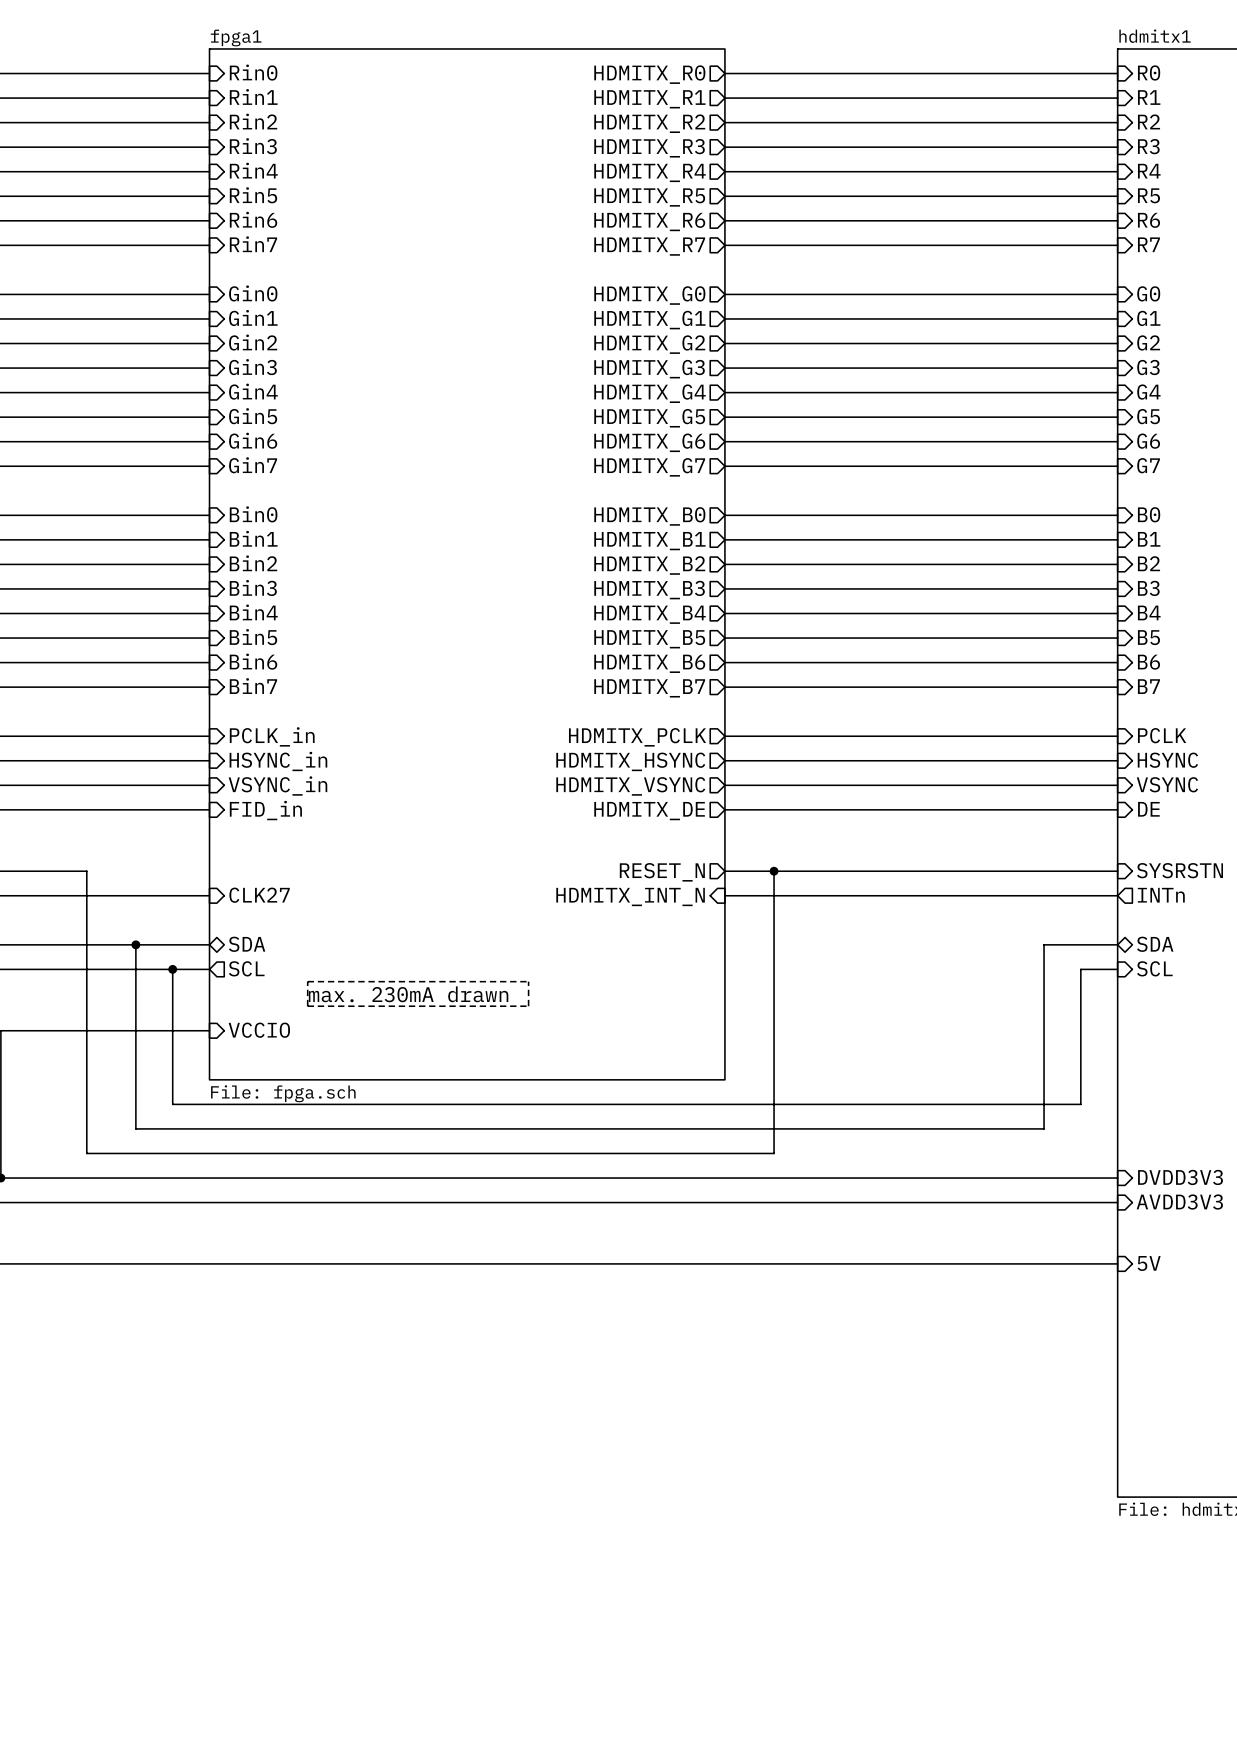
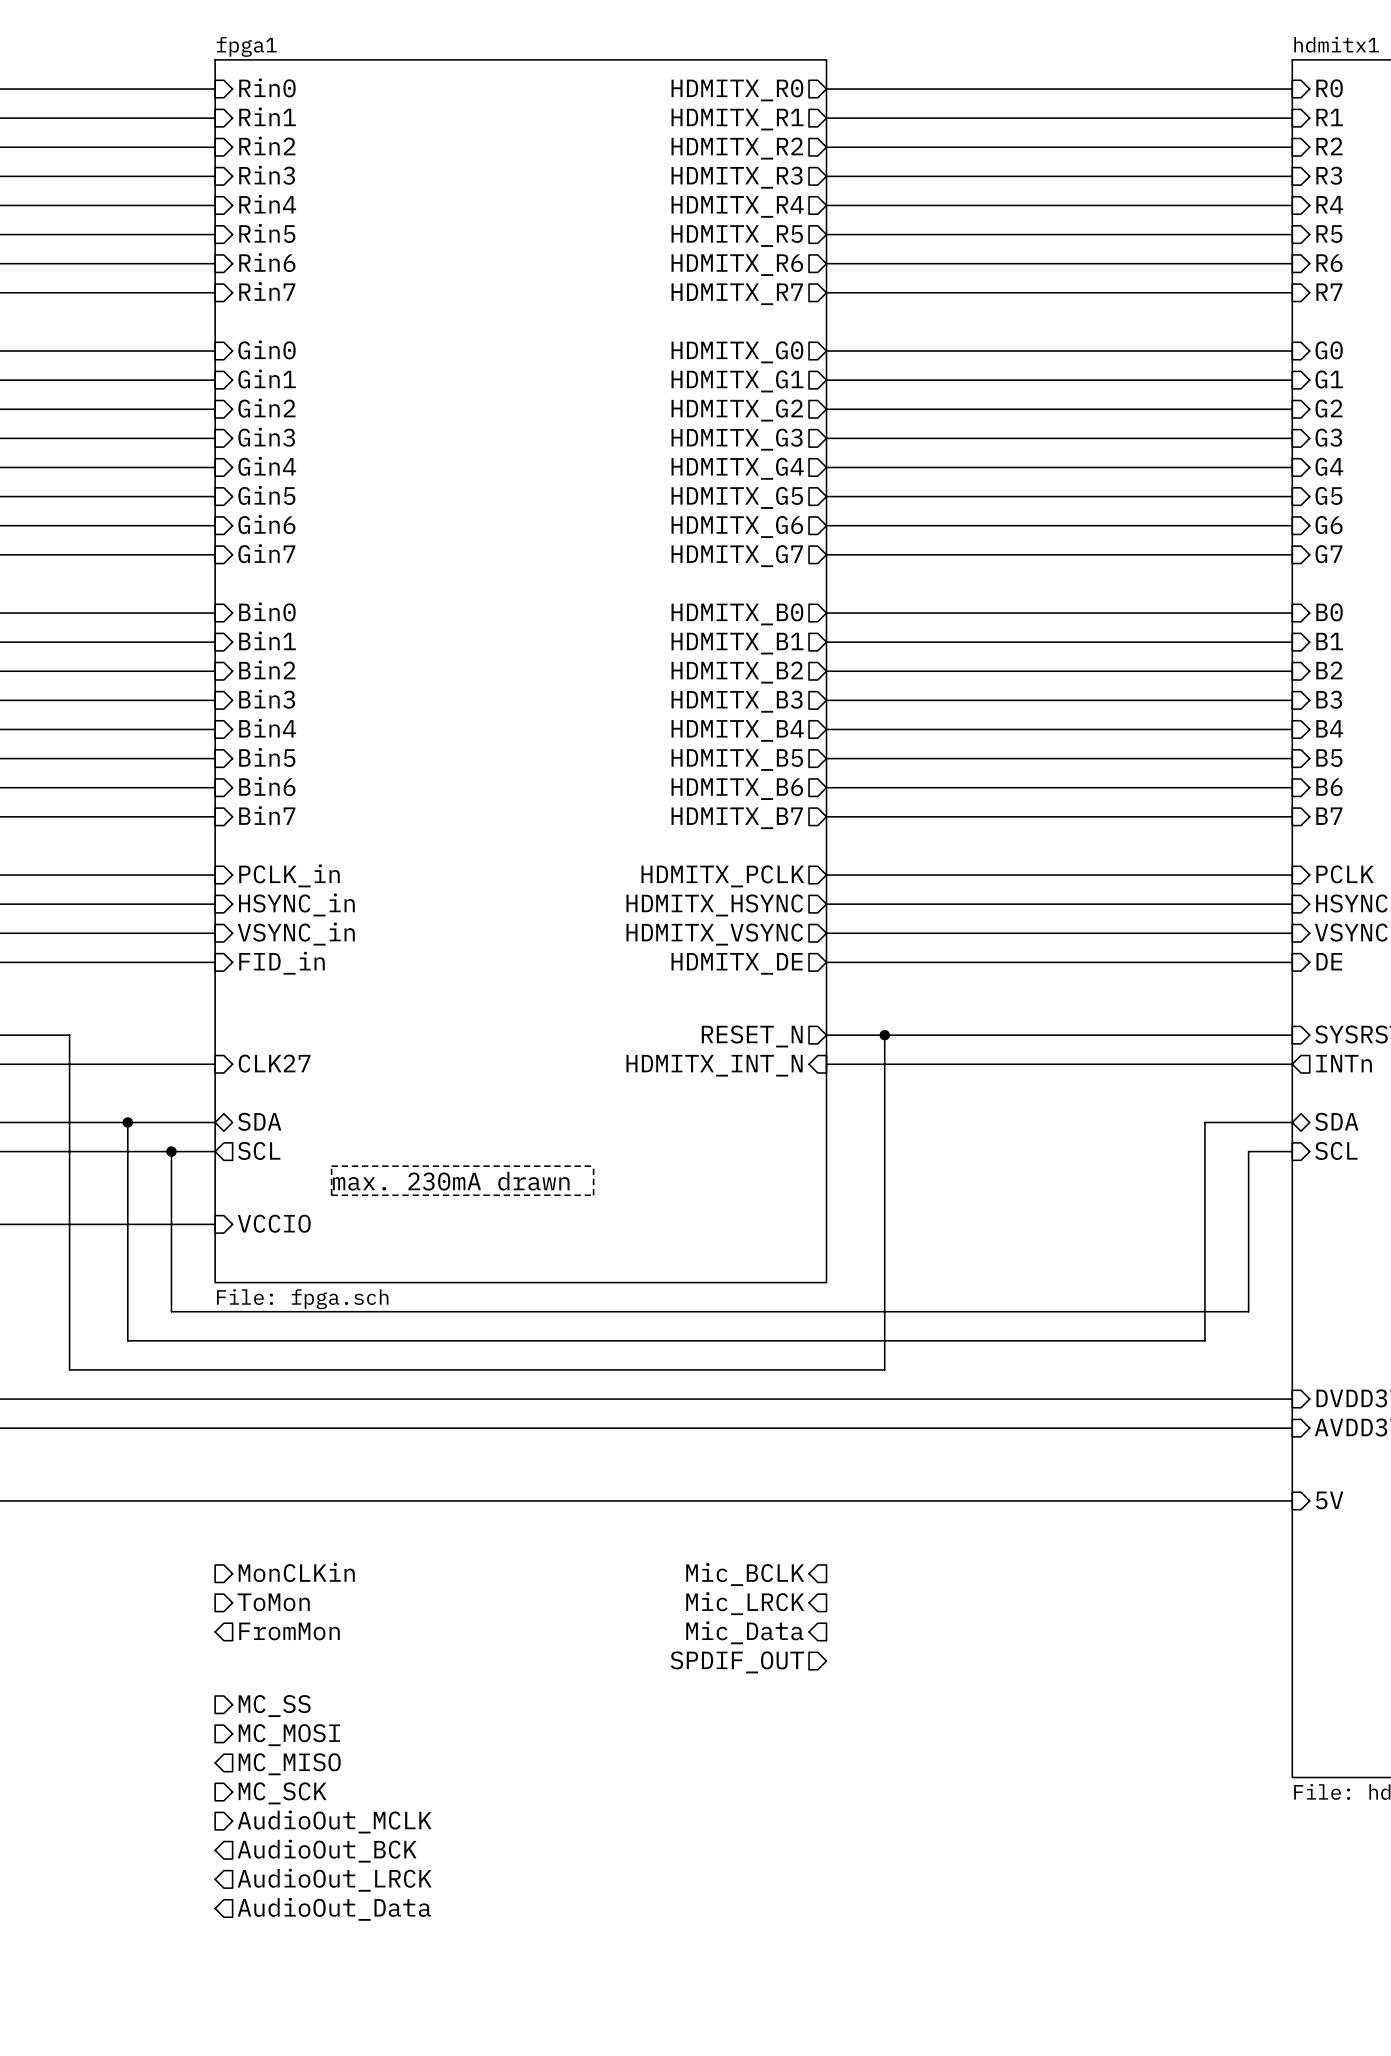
sheet pin: none -> MonCLKin (296, 1572)
sheet pin: none -> Mic_BCLK (745, 1574)
sheet pin: none -> ToMon (273, 1602)
sheet pin: none -> Mic_LRCK (745, 1603)
sheet pin: none -> FromMon (289, 1631)
sheet pin: none -> Mic_Data (744, 1632)
sheet pin: none -> SPDIF_OUT (737, 1662)
sheet pin: none -> MC_SS (274, 1706)
sheet pin: none -> MC_MOSI (289, 1735)
sheet pin: none -> MC_MISO (289, 1764)
sheet pin: none -> MC_SCK (282, 1793)
sheet pin: none -> AudioOut_MCLK (334, 1822)
sheet pin: none -> AudioOut_BCK (327, 1851)
sheet pin: none -> AudioOut_LRCK (334, 1880)
sheet pin: none -> AudioOut_Data (334, 1909)

